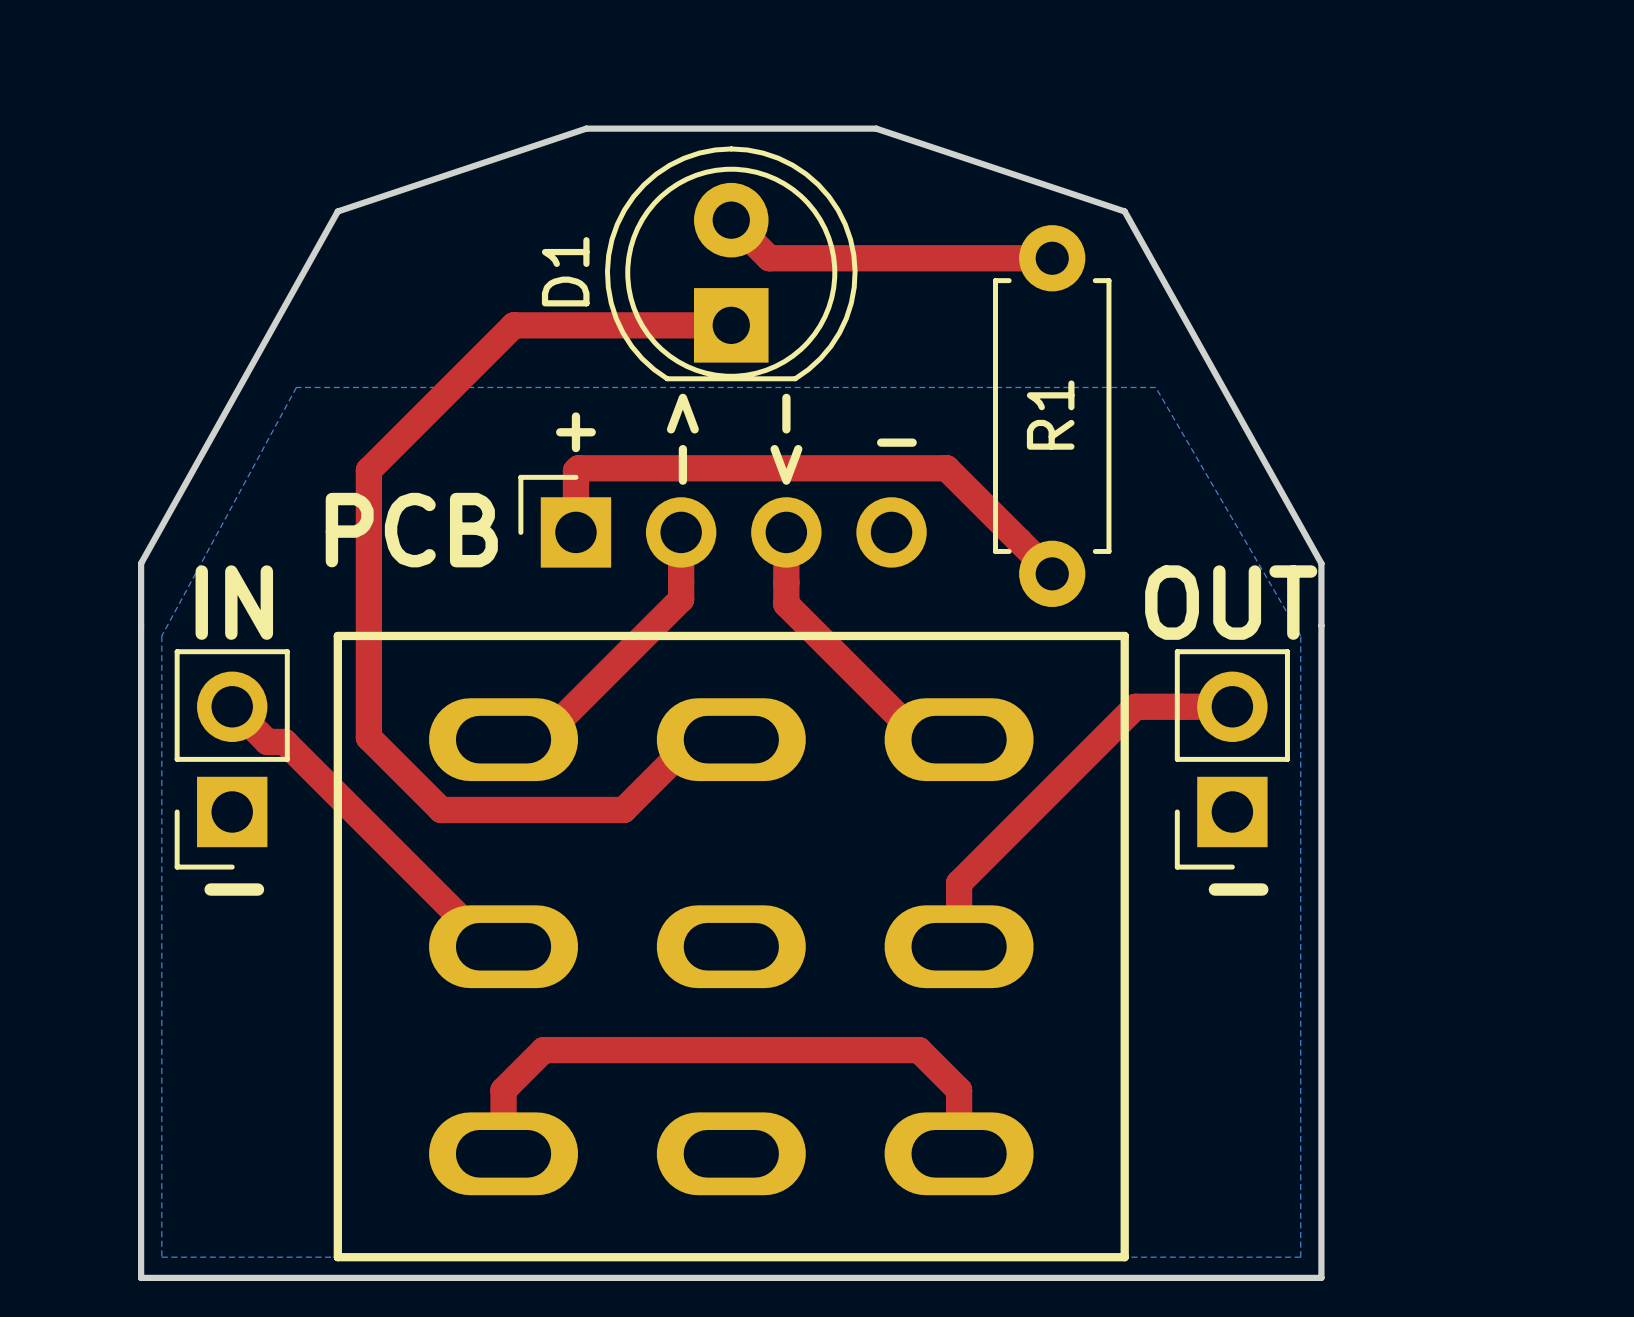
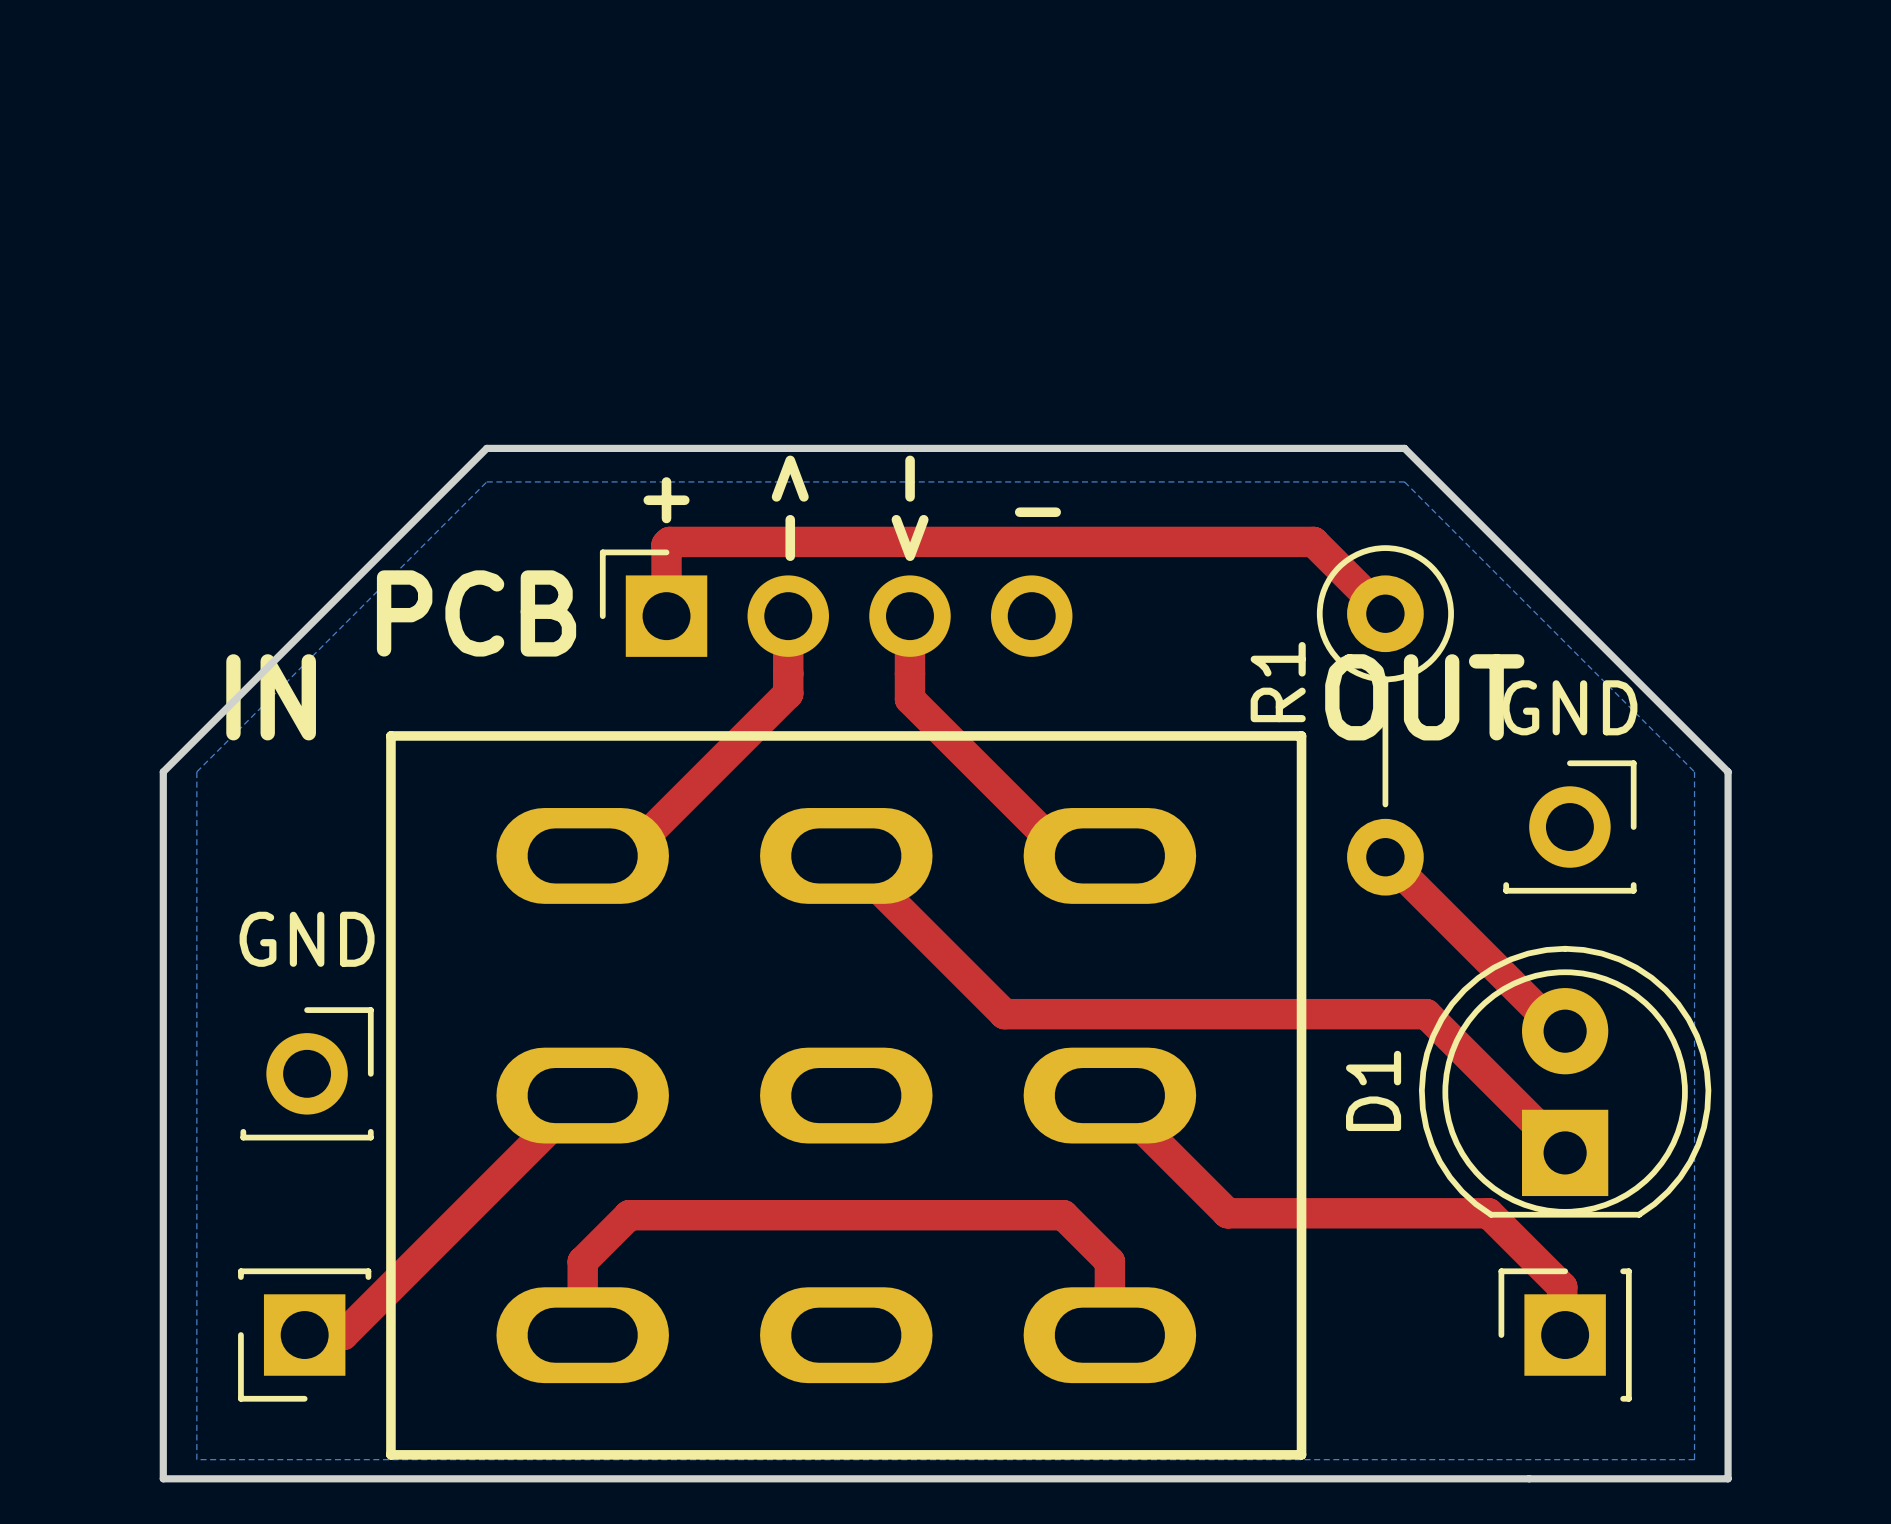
top track: (731, 220) (769, 258) (1052, 258) -> none
R1 footprint: [993, 225, 1112, 607] -> [1316, 545, 1454, 896]
D1 position: (731, 263) -> (1565, 1081)
top track: (731, 325) (513, 325) (368, 470) (368, 737) (441, 810) (623, 810) (694, 739) (731, 739) -> (1565, 1152) (1426, 1014) (1004, 1014) (846, 855)
bottom zone outline: (296, 387) (1155, 387) (1300, 635) (1300, 1257) (161, 1257) (161, 635) (296, 387) -> (486, 481) (196, 771) (196, 1459) (1694, 1459) (1694, 771) (1404, 481) (486, 481)
R1 name position: R1 (1050, 415) -> R1 (1278, 682)
top track: (946, 468) (1052, 573) -> (1095, 541) (1313, 541) (1385, 613)
board edge: (141, 667) (141, 563) (337, 211) (586, 128) (876, 128) (1124, 211) (1321, 563) (1321, 1277) -> (163, 771) (486, 448) (1404, 448) (1728, 771) (1728, 1478) (1529, 1478)
top track: (232, 706) (267, 741) (284, 741) (489, 946) -> none
top track: (1232, 706) (1135, 706) (959, 883) (959, 946) -> (1562, 1344) (1562, 1287) (1488, 1213) (1227, 1213) (1109, 1095)
GND: none -> (1569, 827)
top track: none -> (1385, 857) (1559, 1031) (1565, 1031) (1565, 1012)
part: (232, 759) -> none
part: (1232, 759) -> none
text: - (234, 889) -> none
text: - (1238, 889) -> none
GND: none -> (307, 1073)
top track: none -> (582, 1095) (343, 1335) (304, 1335)
part: none -> (304, 1335)
part: none -> (1565, 1335)

